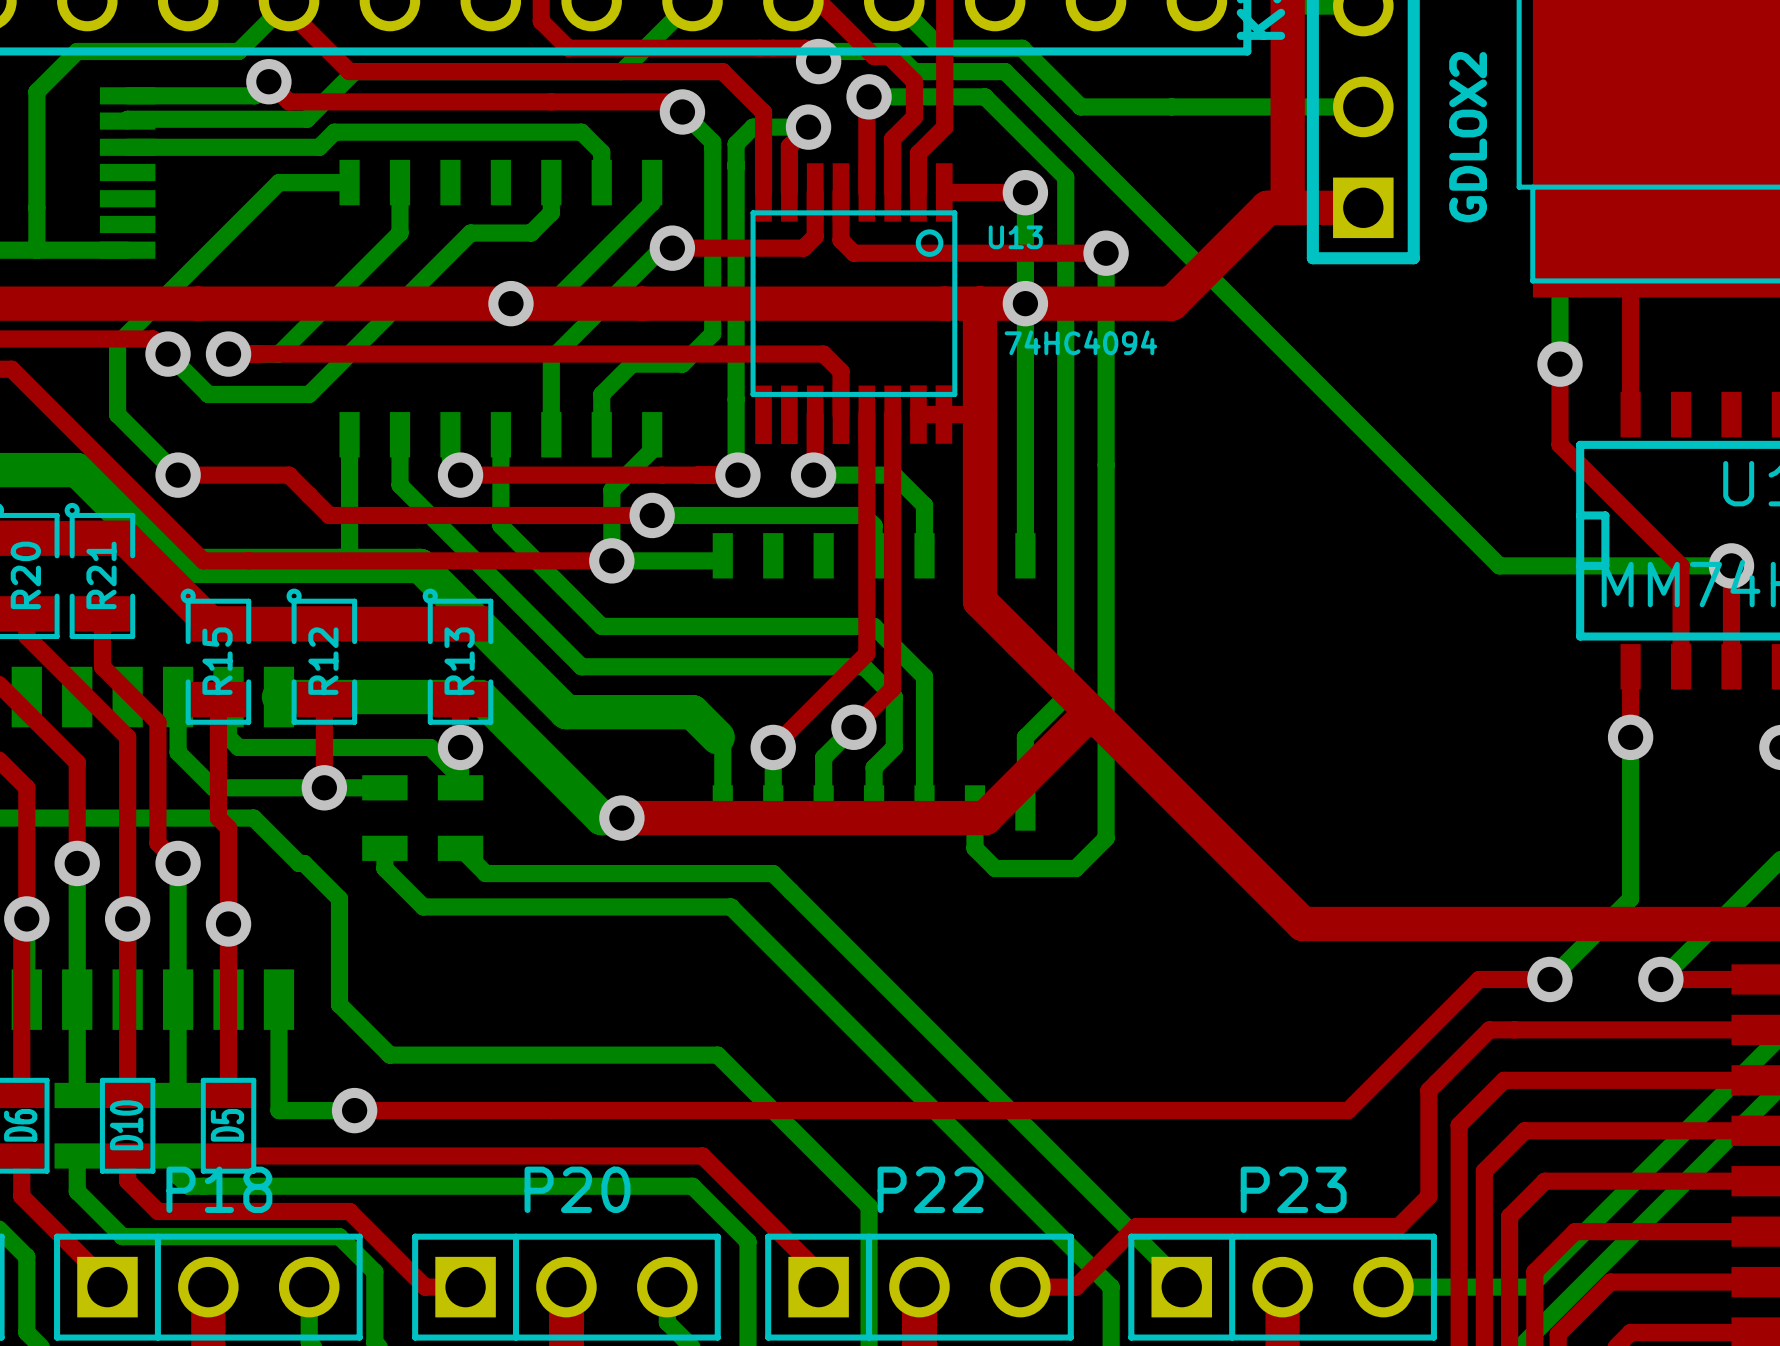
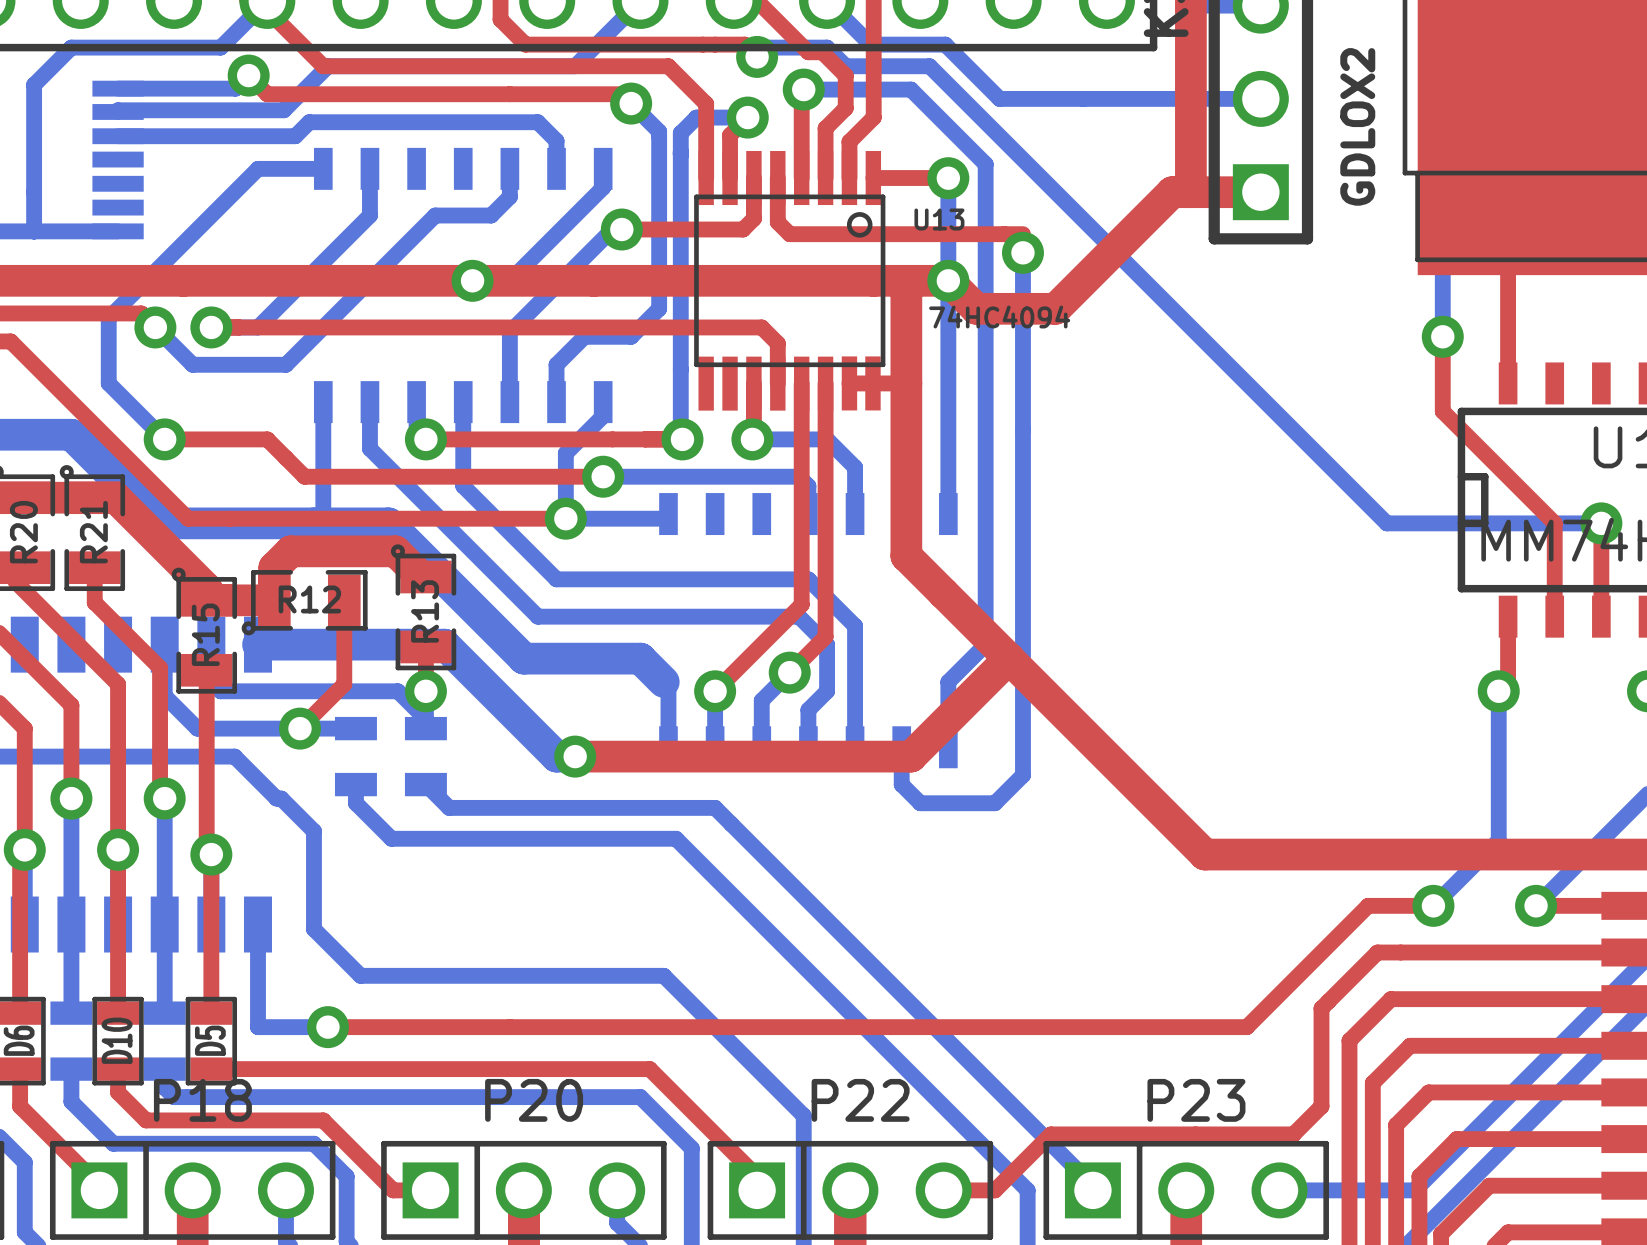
via position: (1106, 253) -> (1022, 252)
top track: (1025, 303) (1171, 303) -> (948, 280) (976, 308) (1055, 308) (1083, 280)
top track: (26, 613) (26, 636) (127, 737) (127, 739) -> (15, 581) (118, 684)
top track: (210, 623) (460, 623) -> (195, 577) (206, 588) (206, 600) (274, 600) (274, 567) (290, 551) (395, 551) (421, 577)
top track: (102, 651) (102, 666) (157, 722) (157, 843) (173, 858) -> (94, 602) (160, 667) (160, 793)
R15 position: (215, 656) -> (204, 630)
R12 rotation: 0° (321, 656) -> 90° counterclockwise (304, 602)
top track: (218, 699) (218, 818) (228, 828) (228, 923) -> (206, 670) (206, 849) (211, 854)
top track: (324, 699) (324, 787) -> (344, 600) (344, 684) (299, 728)
bottom track: (1630, 737) (1630, 898) (1620, 908) -> (1498, 691) (1498, 840)
via position: (1630, 737) -> (1498, 691)

